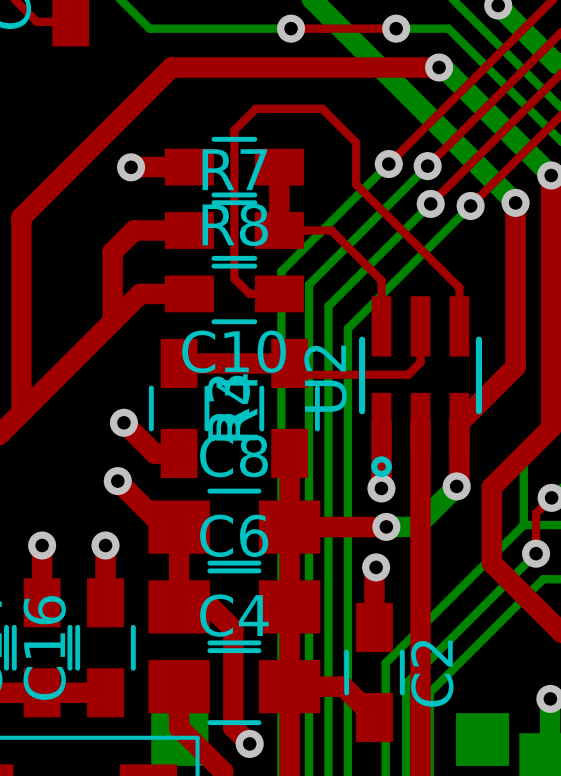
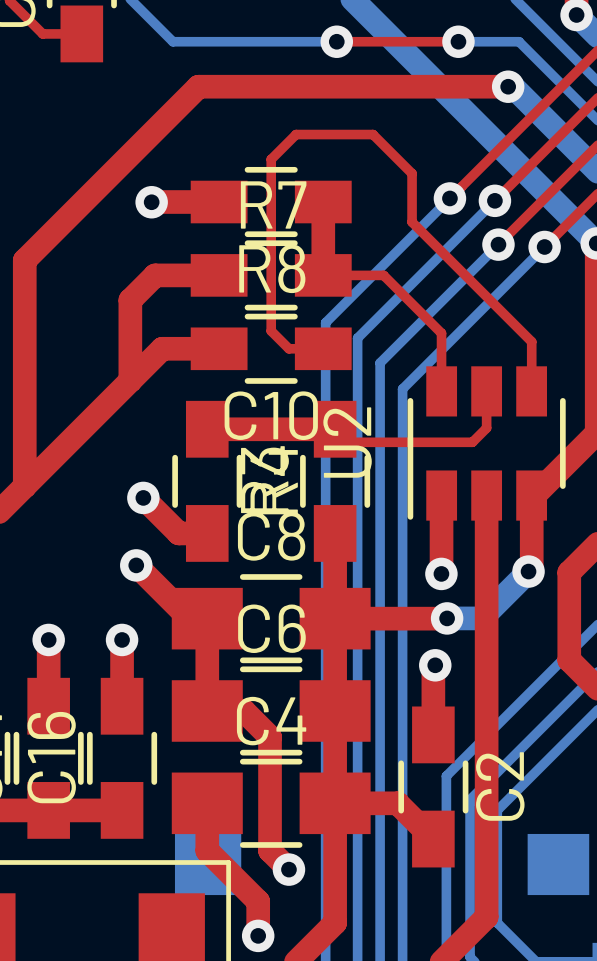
U2 footprint: [359, 296, 483, 478] -> [407, 366, 566, 521]

